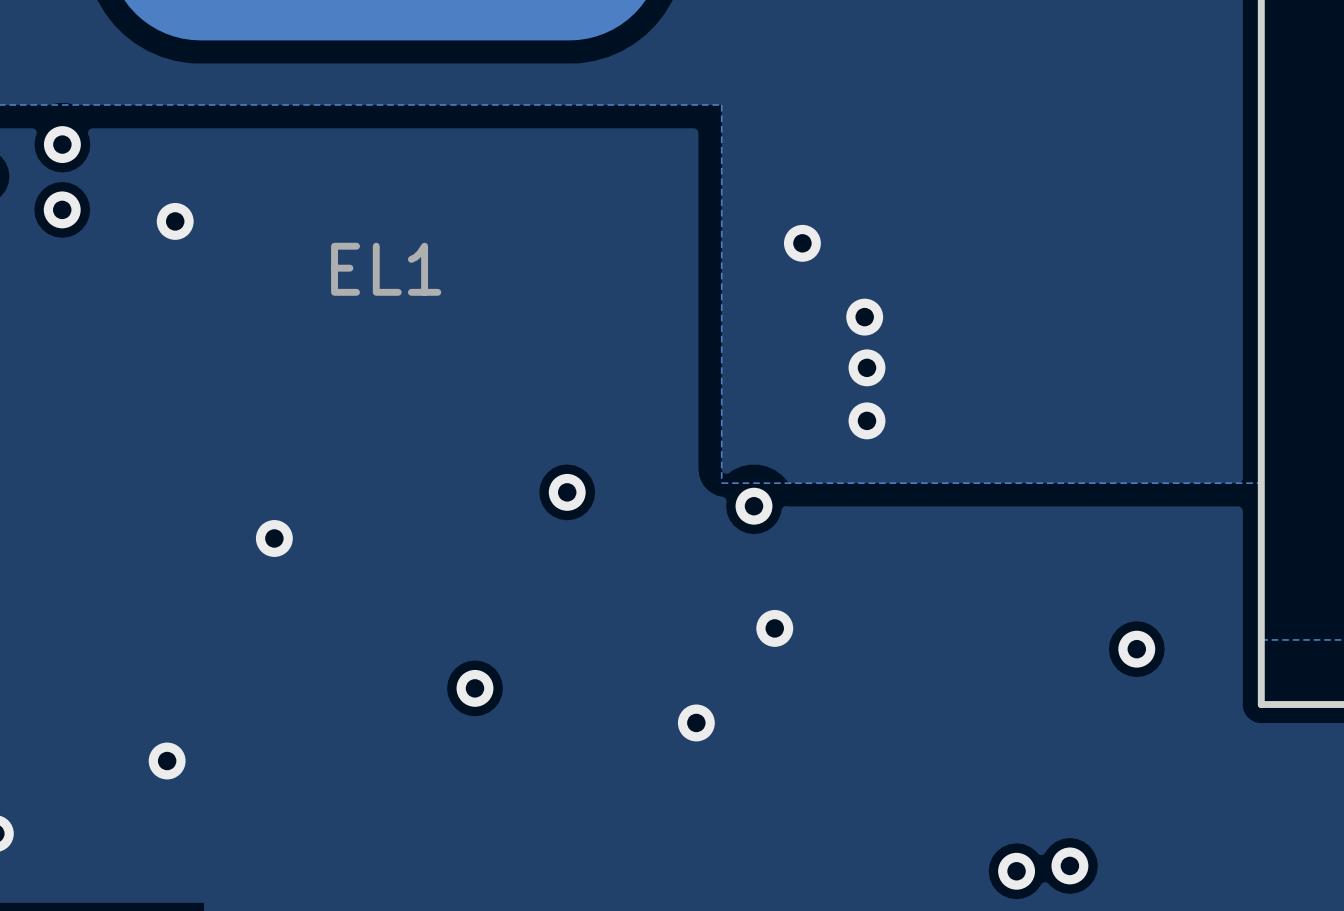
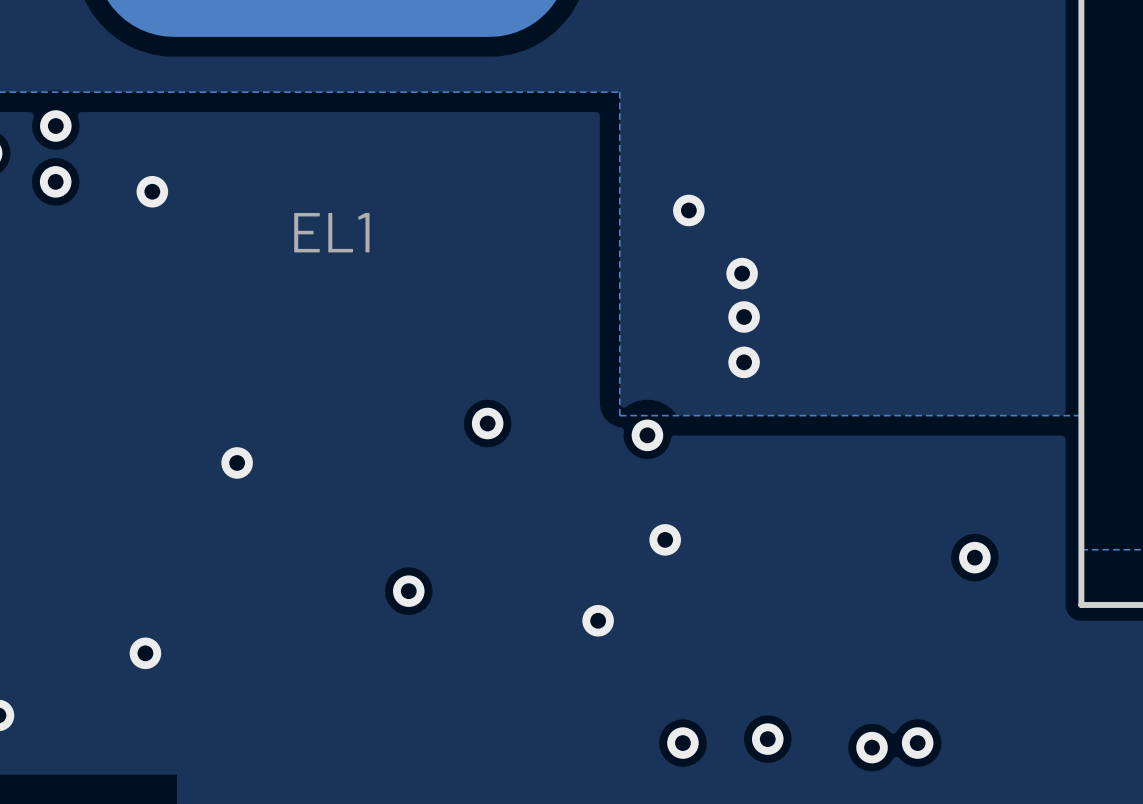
via: none -> (767, 739)
via: none -> (682, 743)

